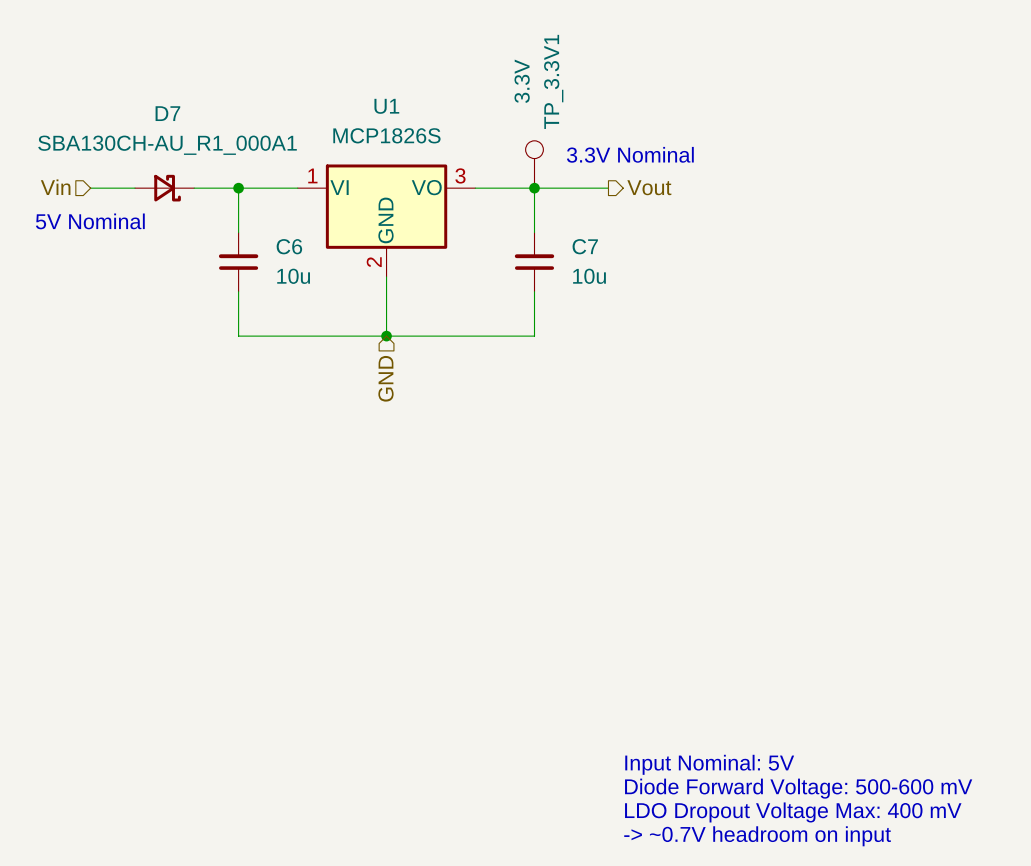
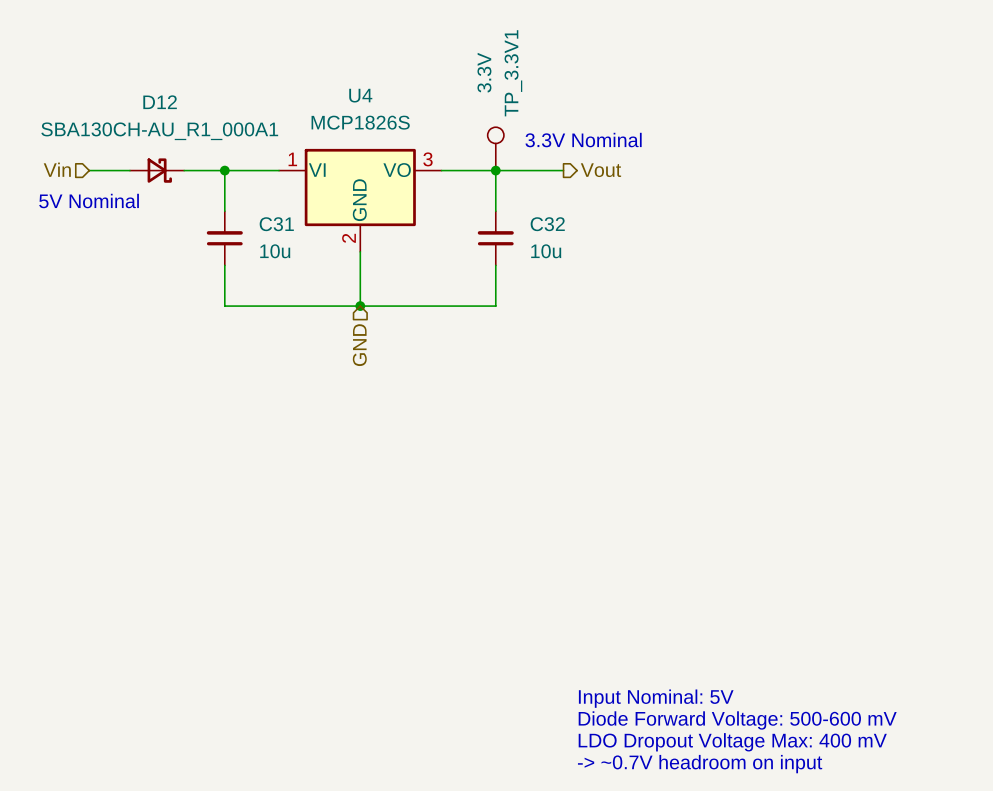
U1 name: U1 (386, 106) -> U4 (360, 95)
D7 name: D7 (167, 113) -> D12 (160, 102)
C6 name: C6 (289, 246) -> C31 (276, 224)
C7 name: C7 (585, 246) -> C32 (547, 224)

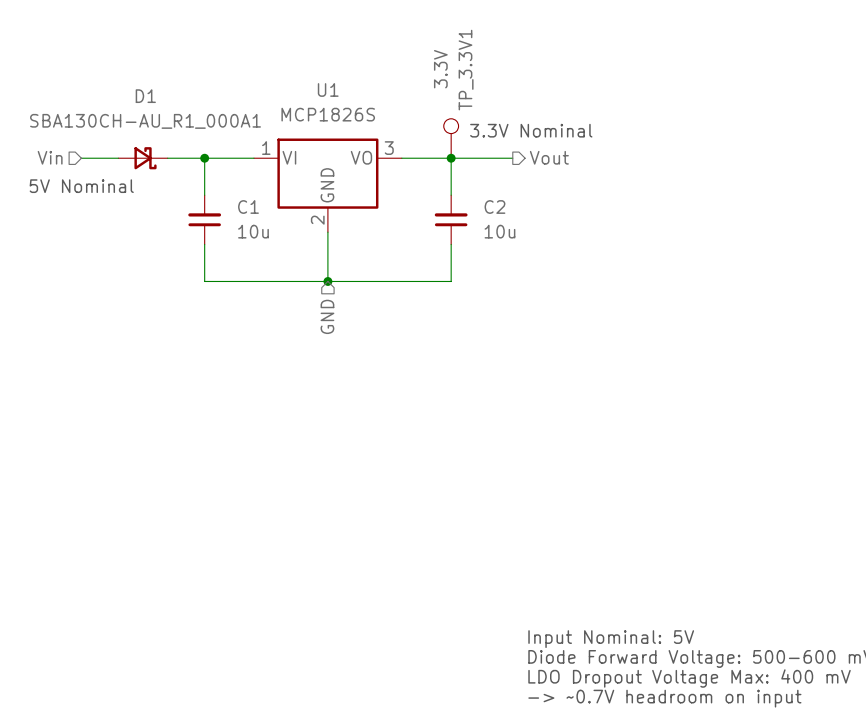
U4 name: U4 (360, 95) -> U1 (328, 89)
D12 name: D12 (160, 102) -> D1 (145, 96)
C31 name: C31 (276, 224) -> C1 (248, 207)
C32 name: C32 (547, 224) -> C2 (494, 207)

